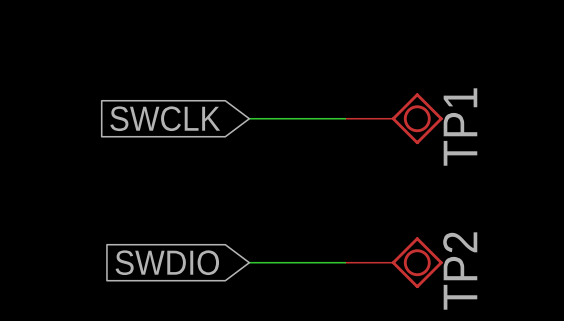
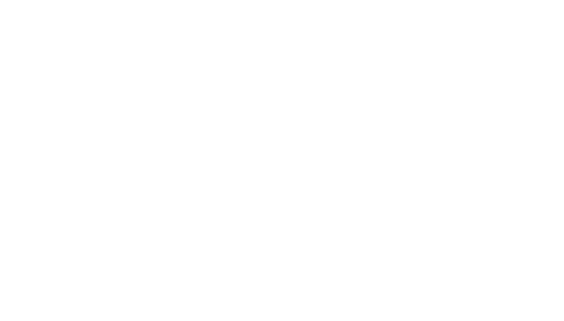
global label: SWCLK (165, 118) -> none
wire: (249, 118) (345, 118) -> none
TP1: (394, 118) -> none
global label: SWDIO (167, 262) -> none
wire: (249, 262) (345, 262) -> none
TP2: (394, 262) -> none

